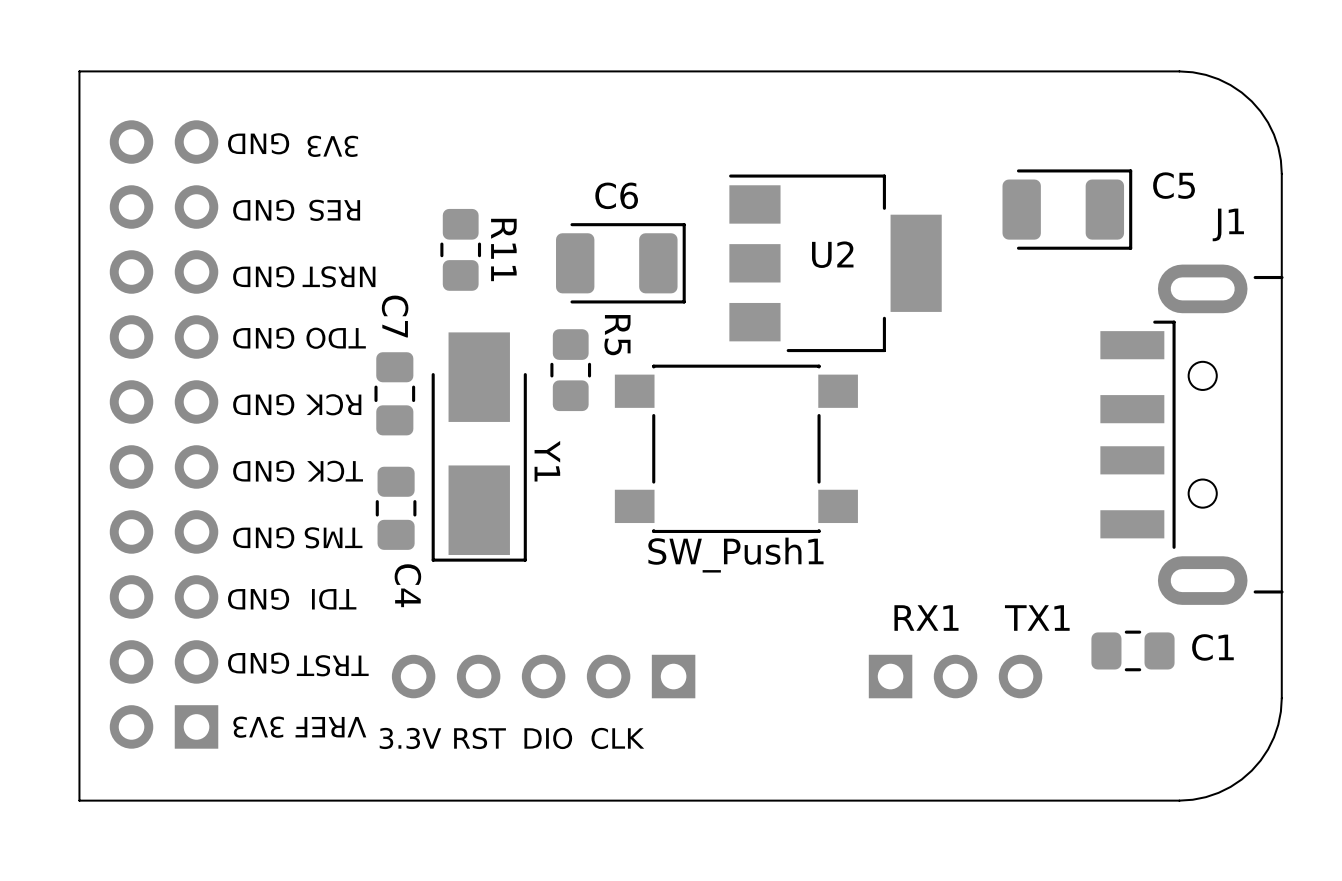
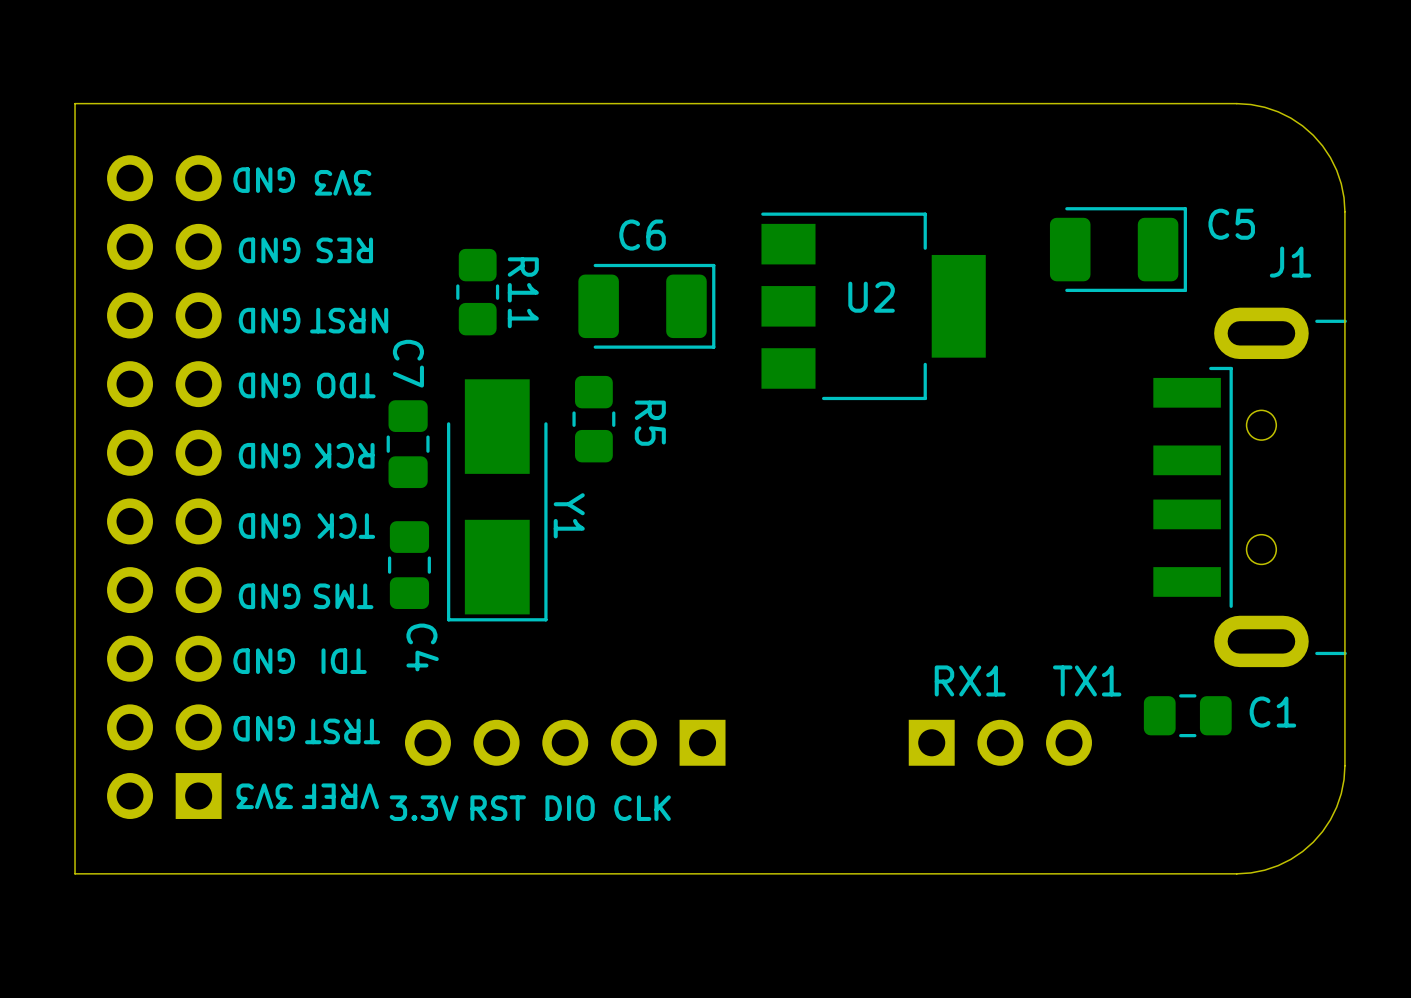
R5 name position: R5 (617, 335) -> R5 (650, 423)
SW_Push1: (736, 448) -> none

